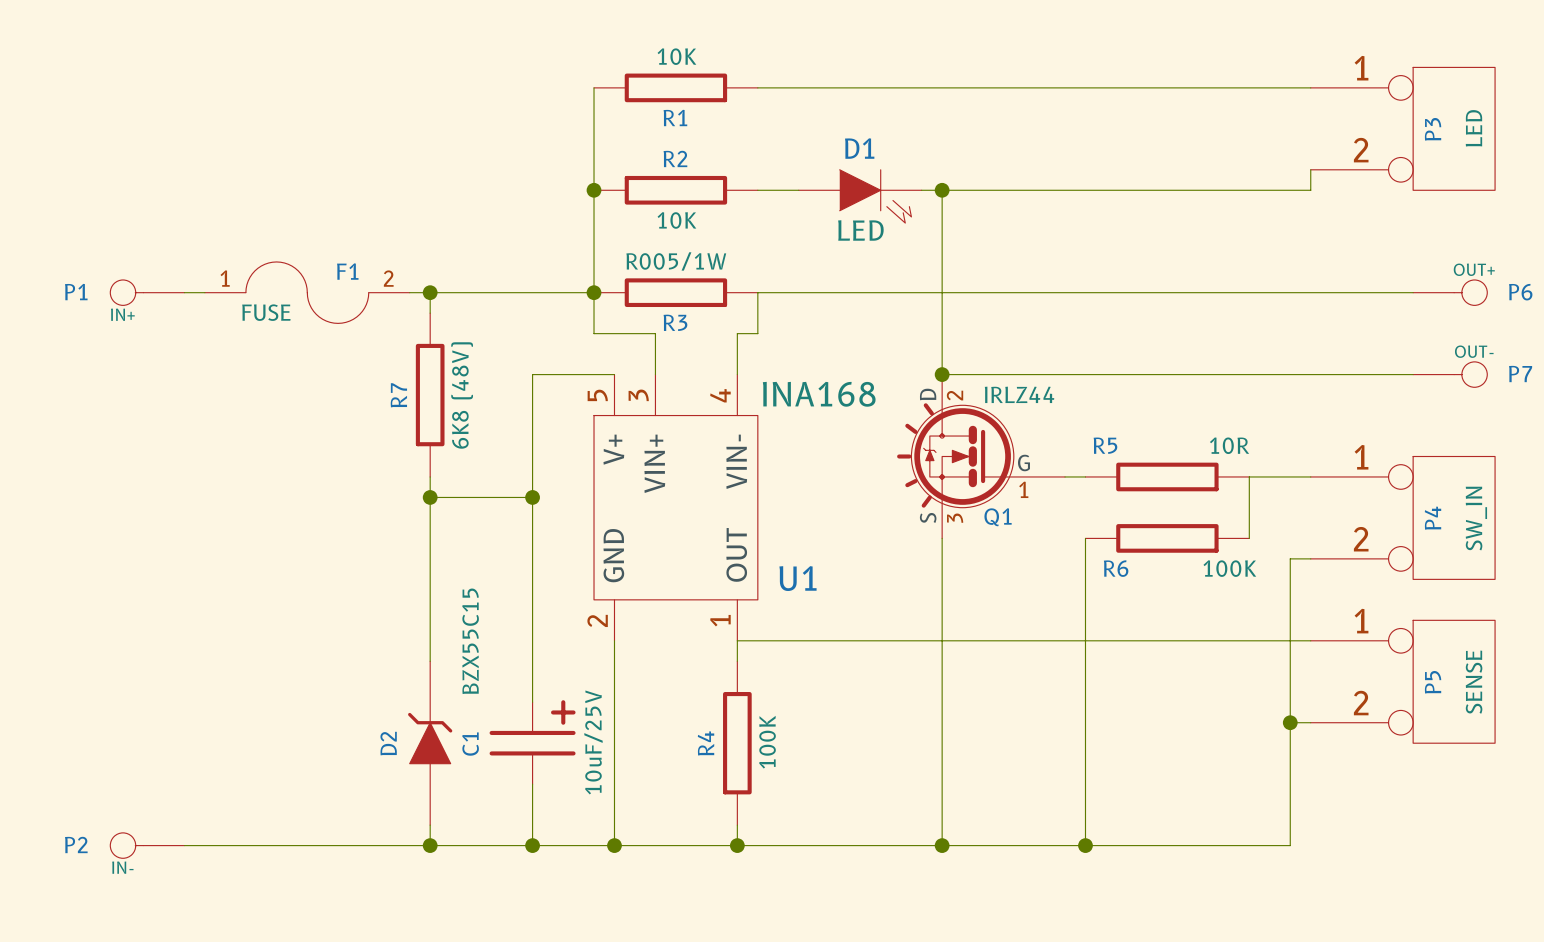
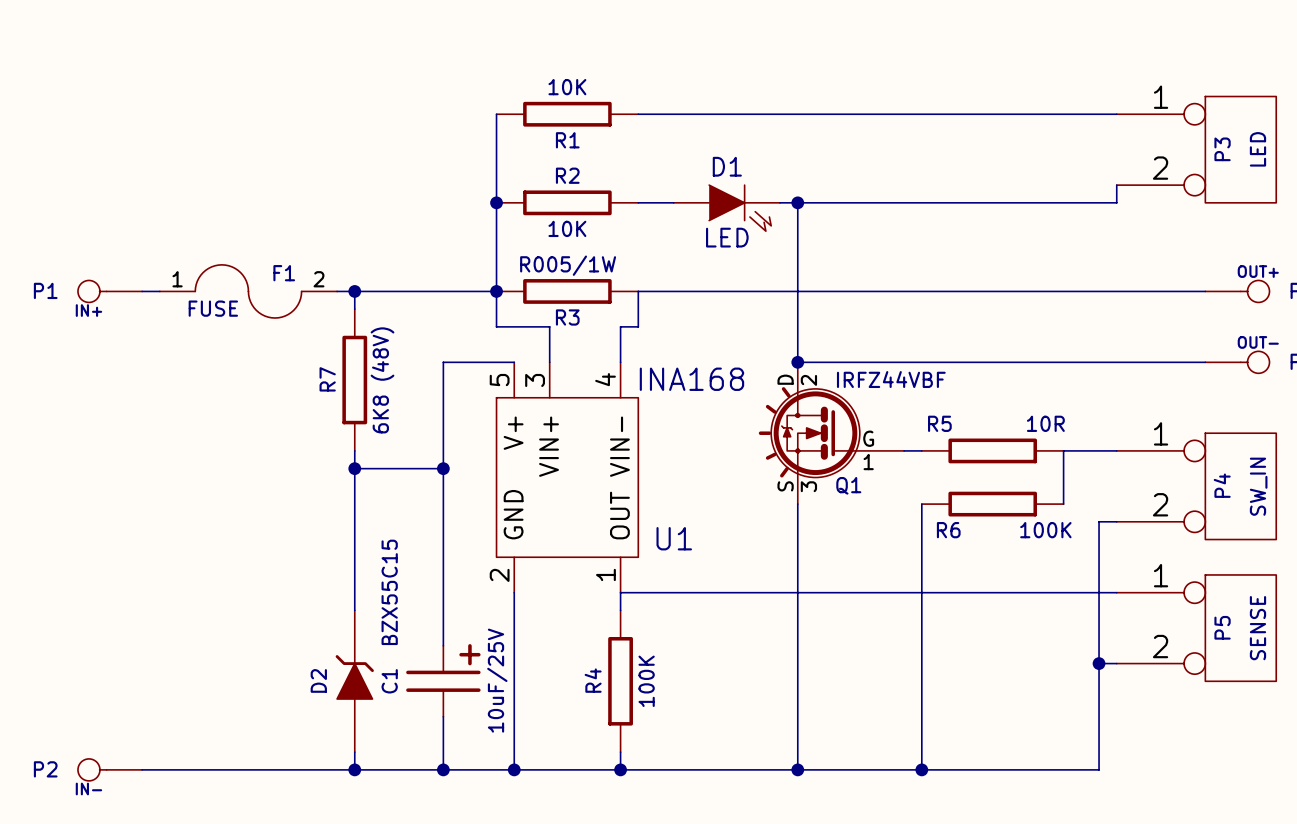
Q1 value: IRLZ44 (1019, 394) -> IRFZ44VBF (891, 379)

